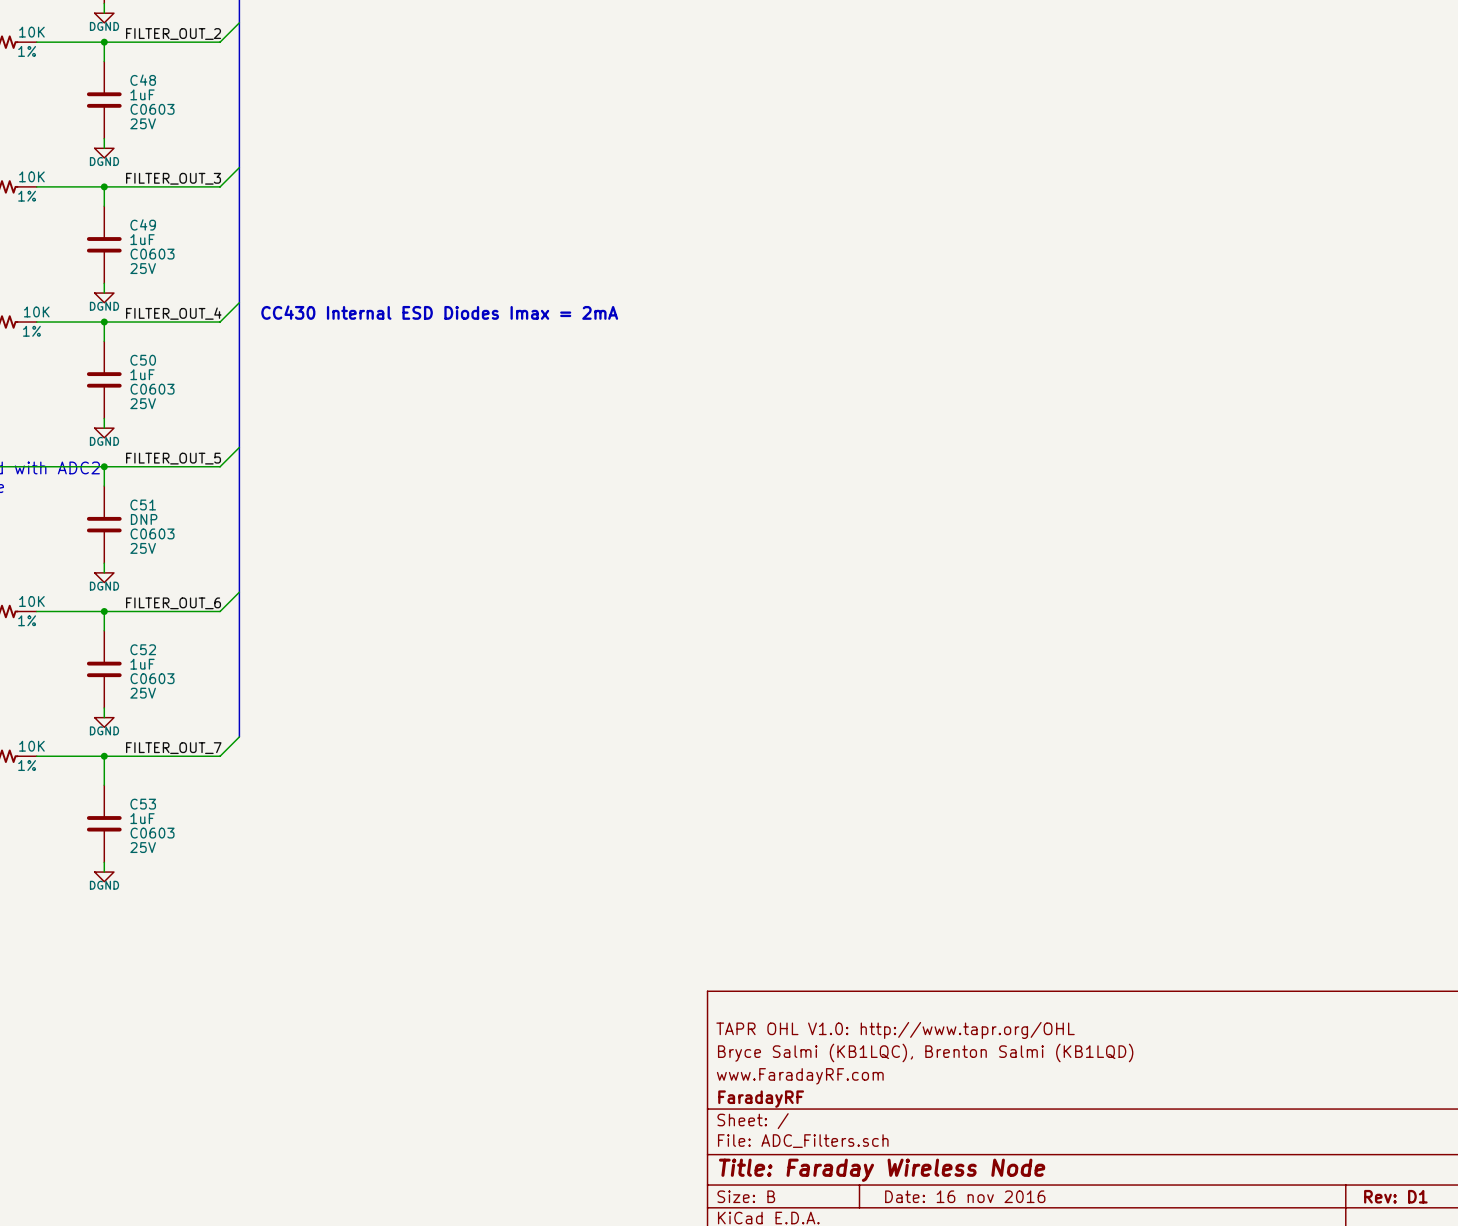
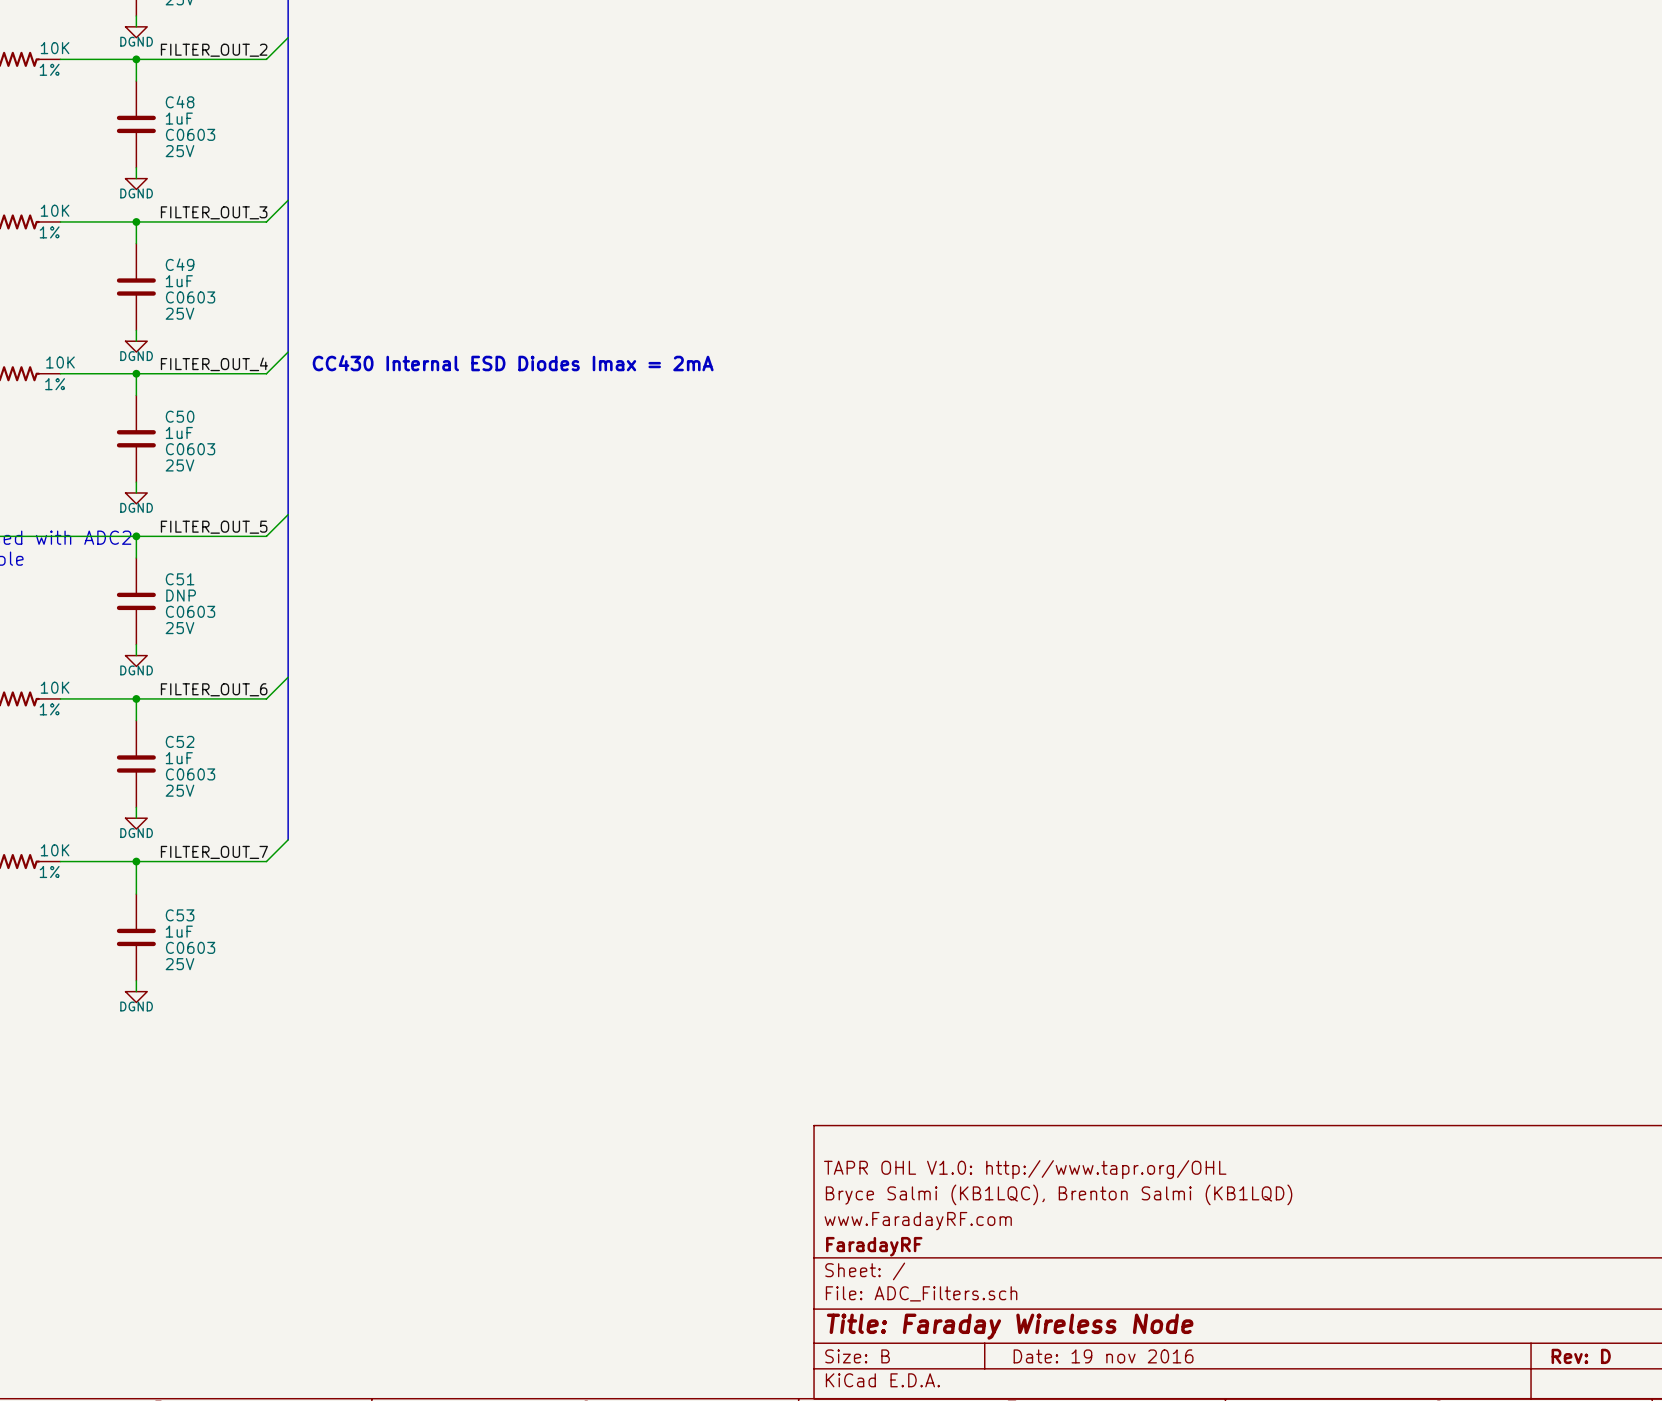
title block: Date: 16 nov 2016 (965, 1196) -> Date: 19 nov 2016 (1103, 1356)
title block: Rev: D1 (1395, 1196) -> Rev: D (1581, 1356)

